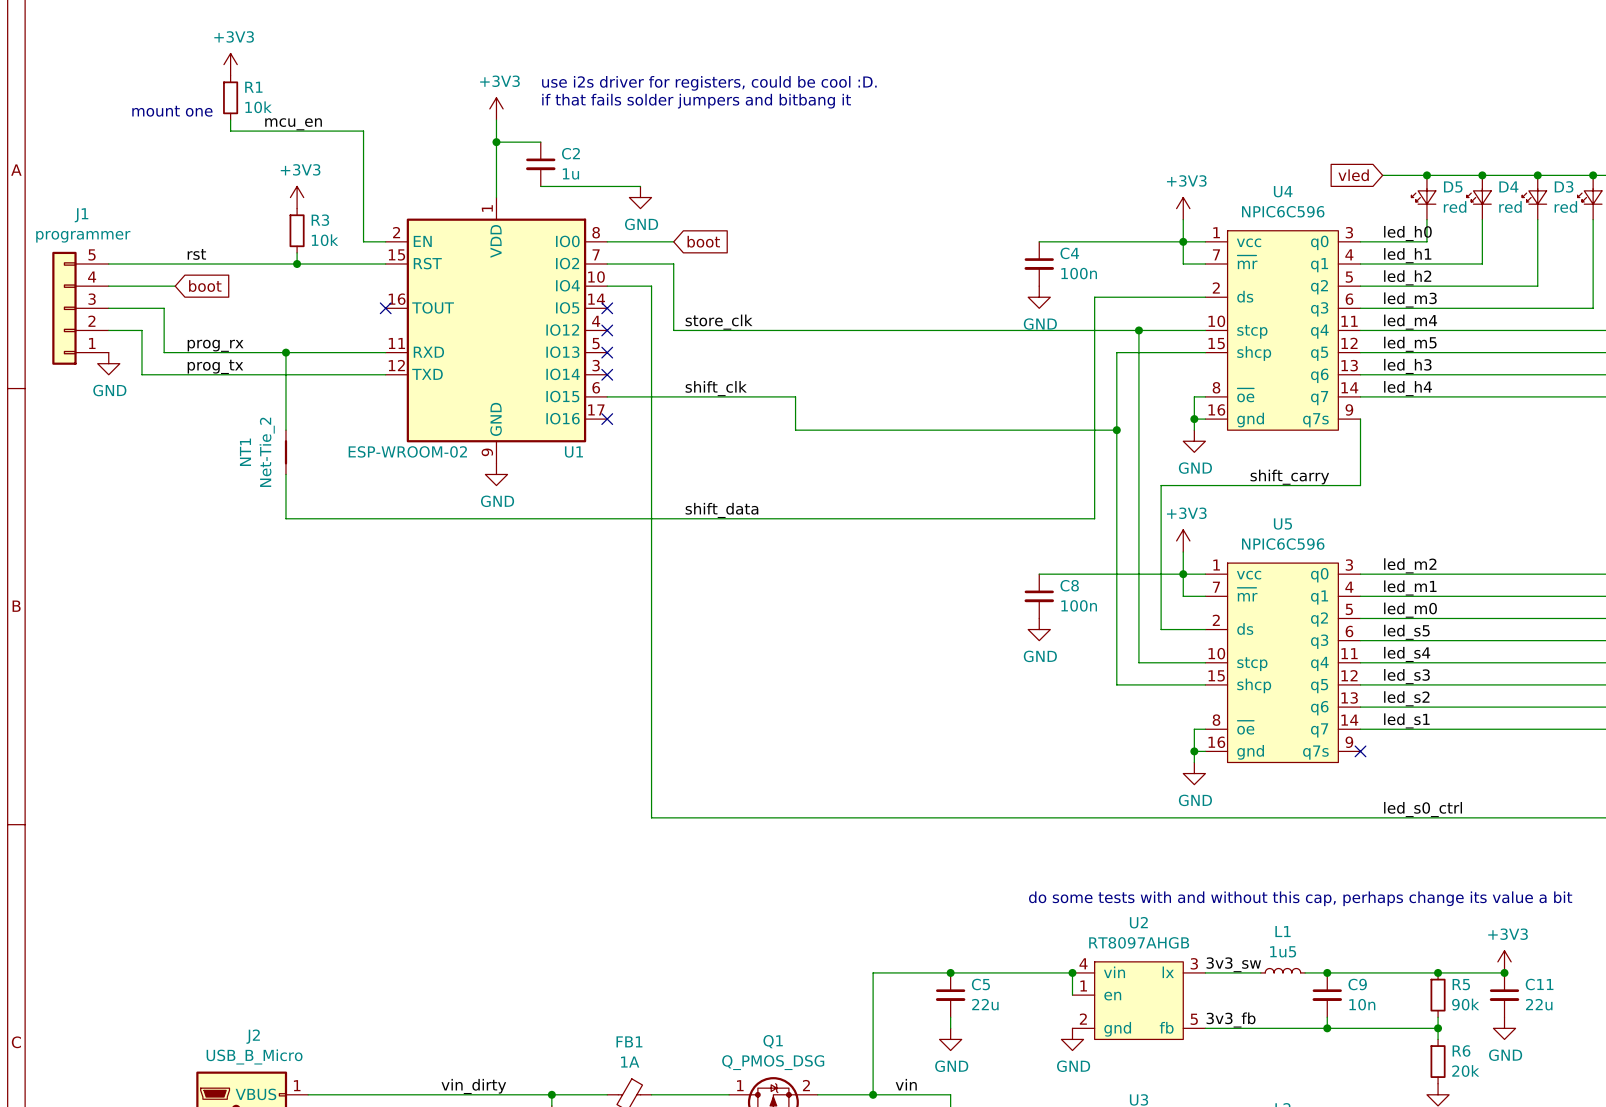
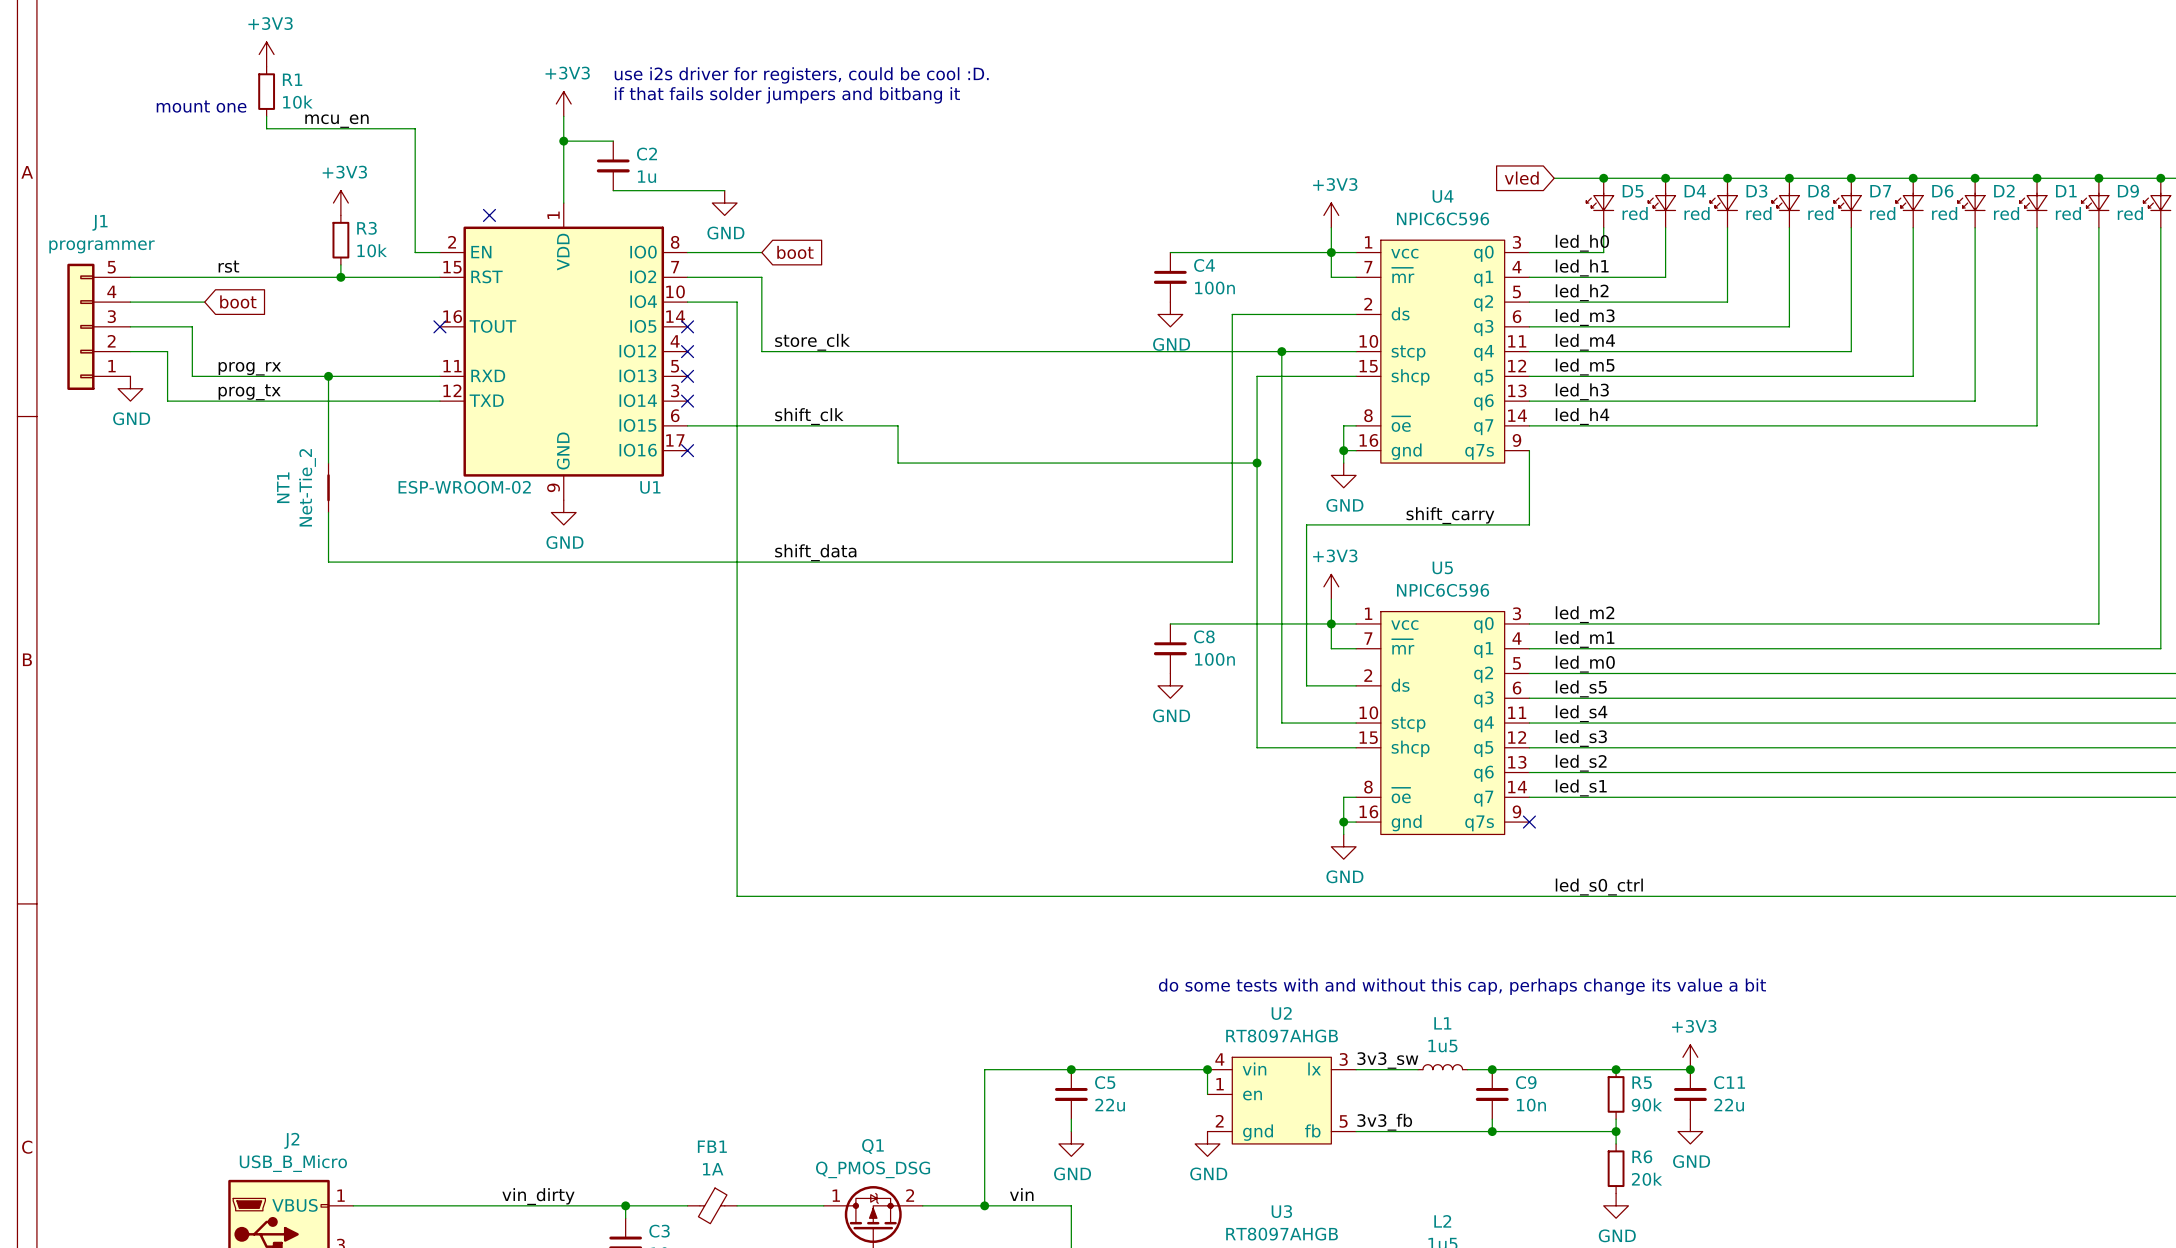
no-connect mark: none -> (489, 215)

